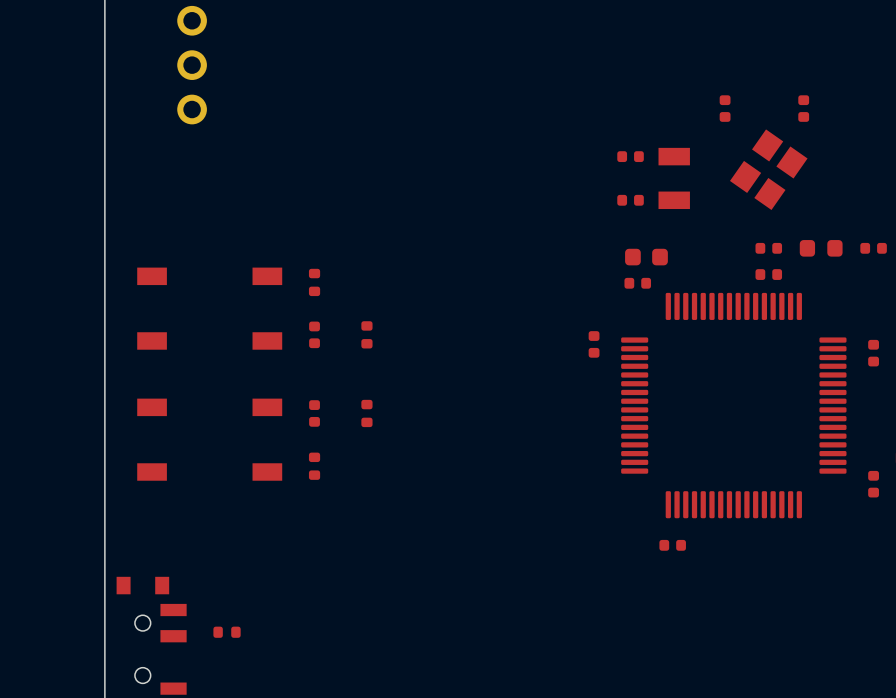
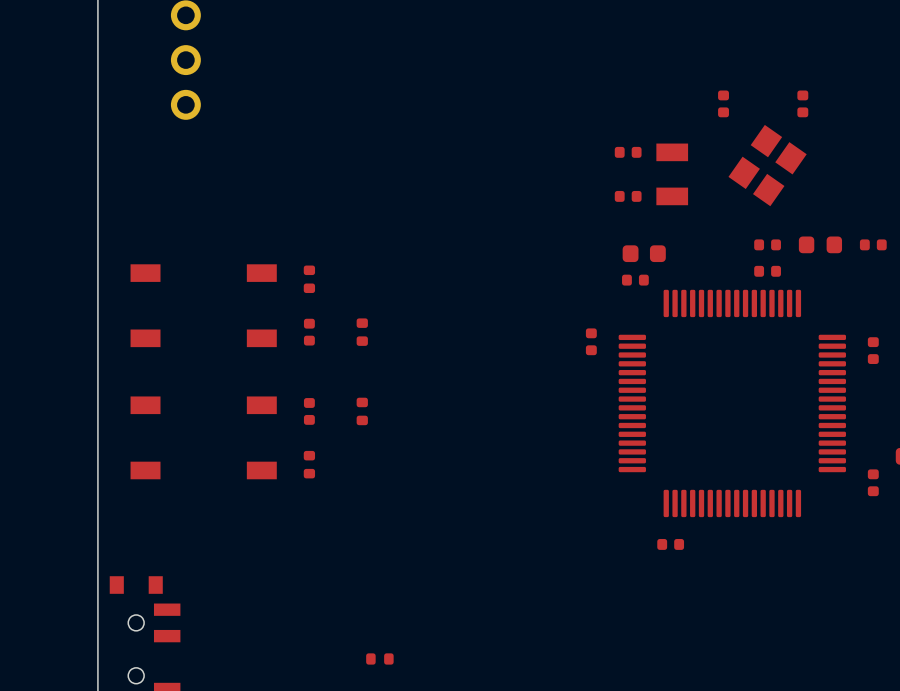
part position: (227, 632) -> (379, 658)

